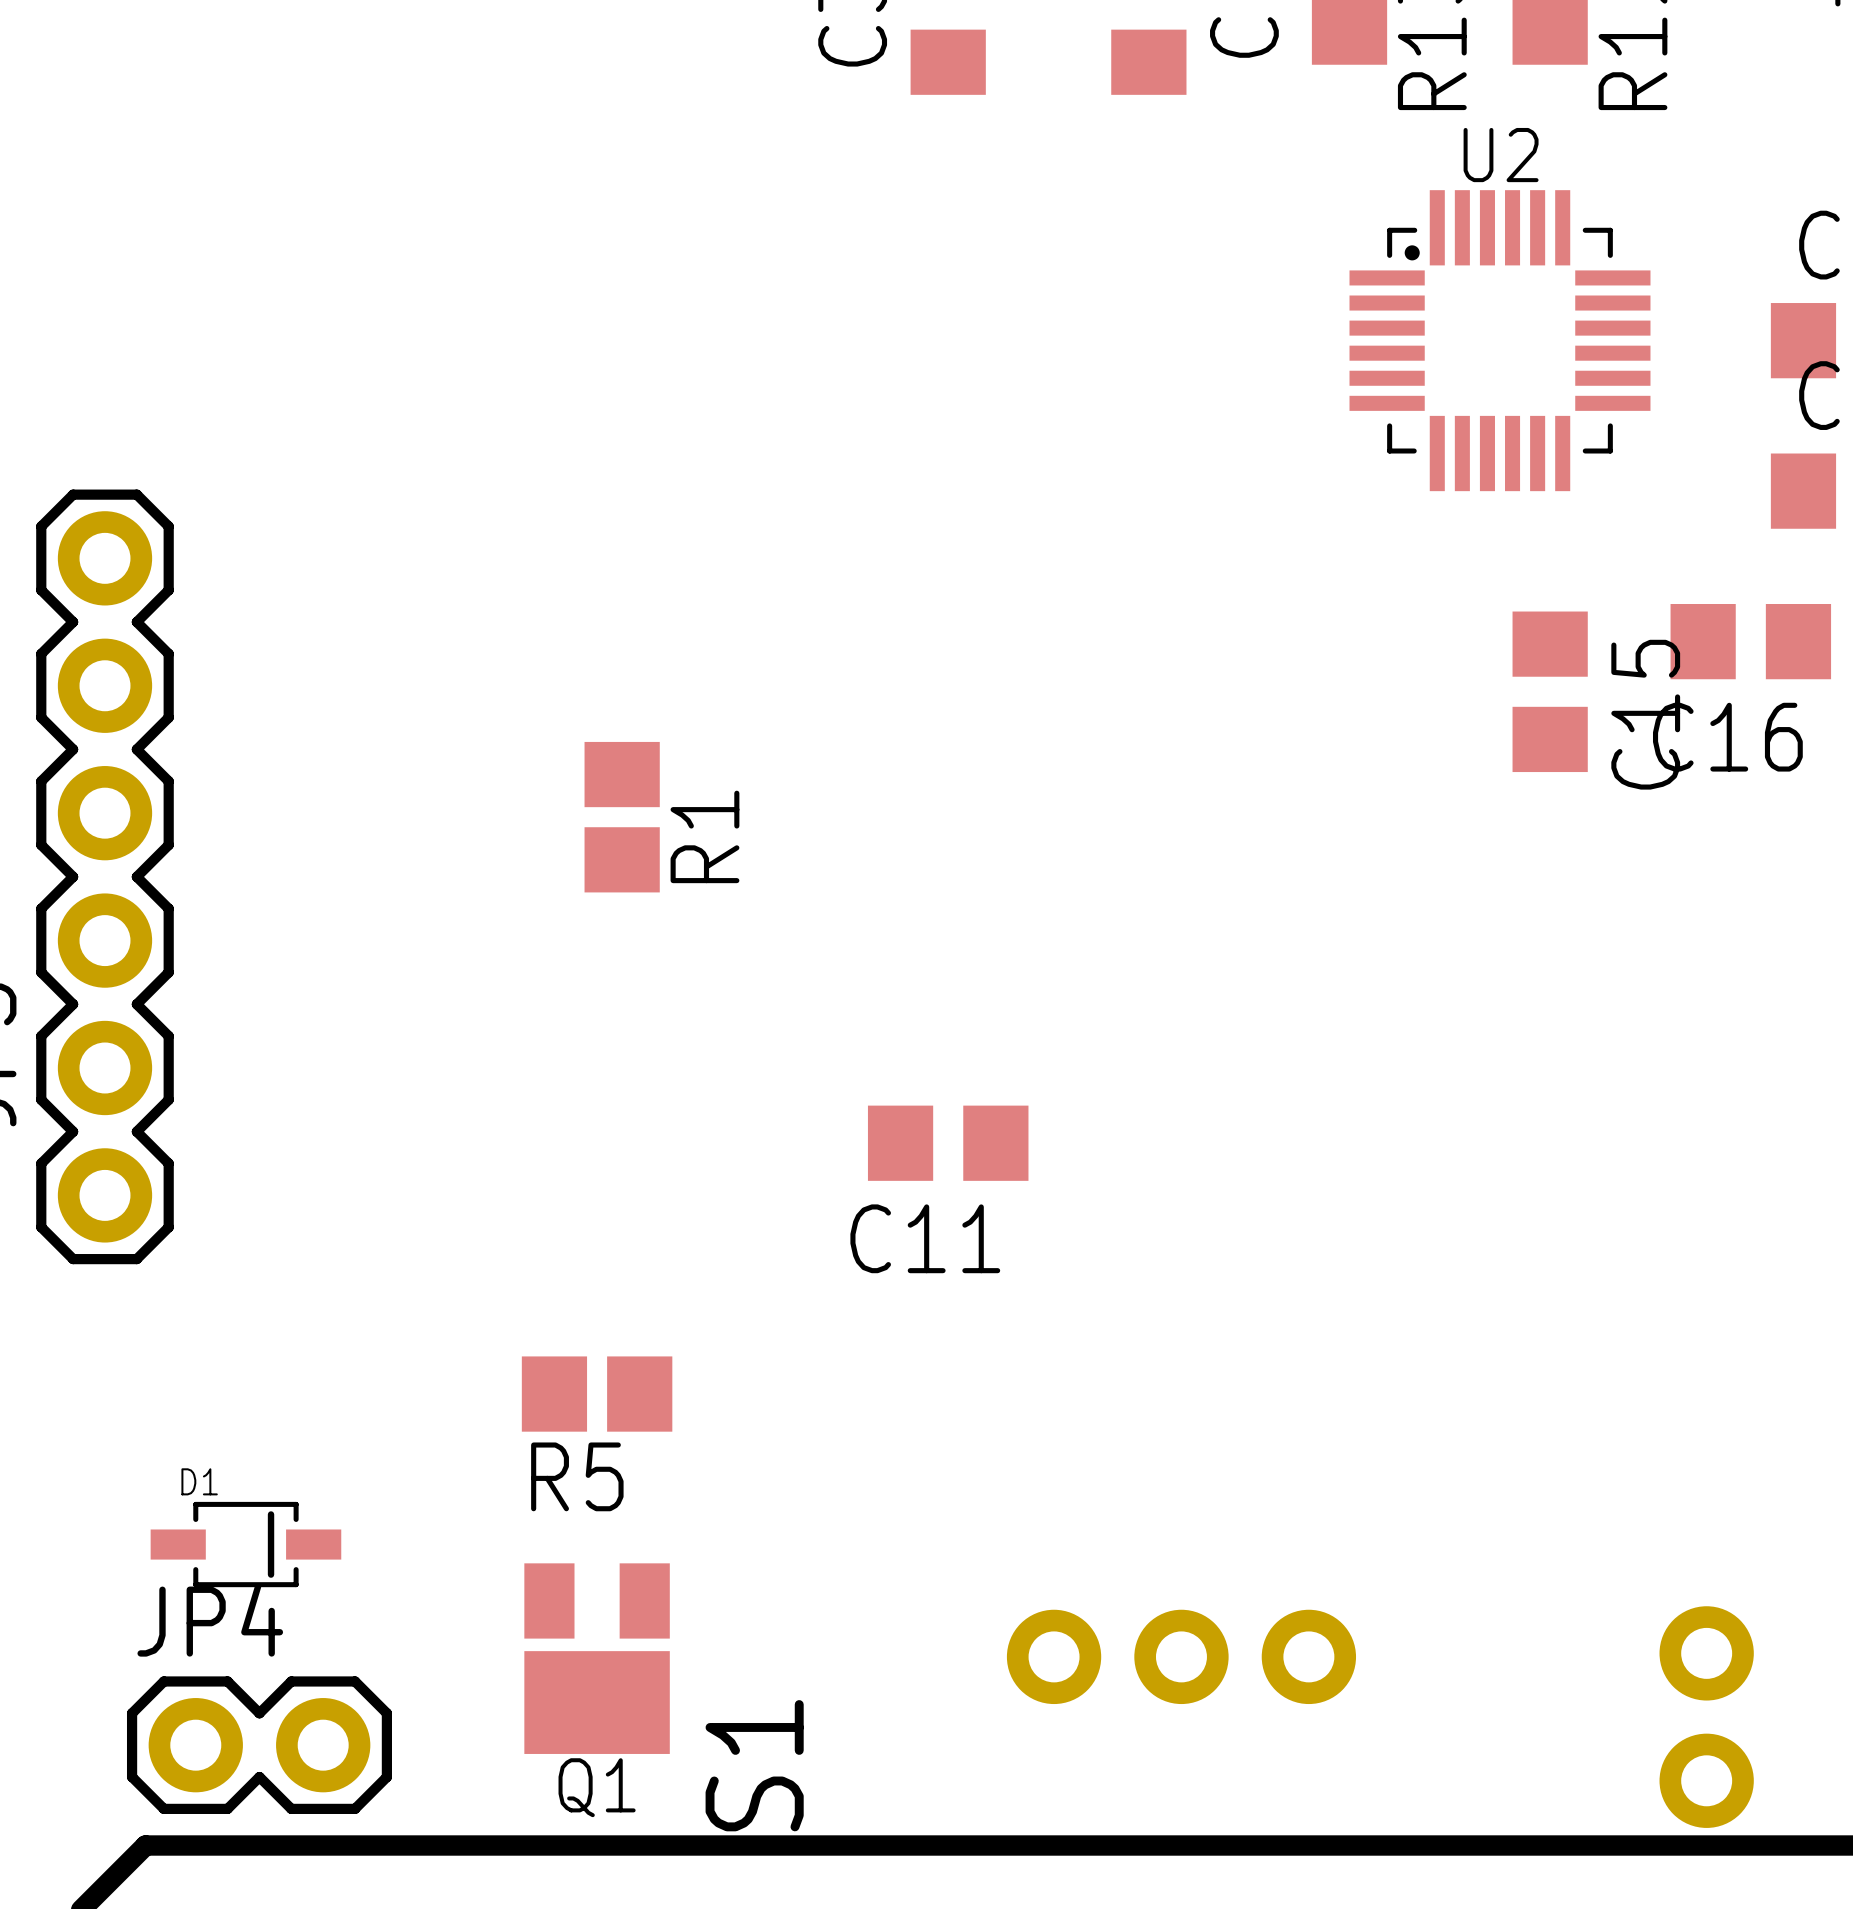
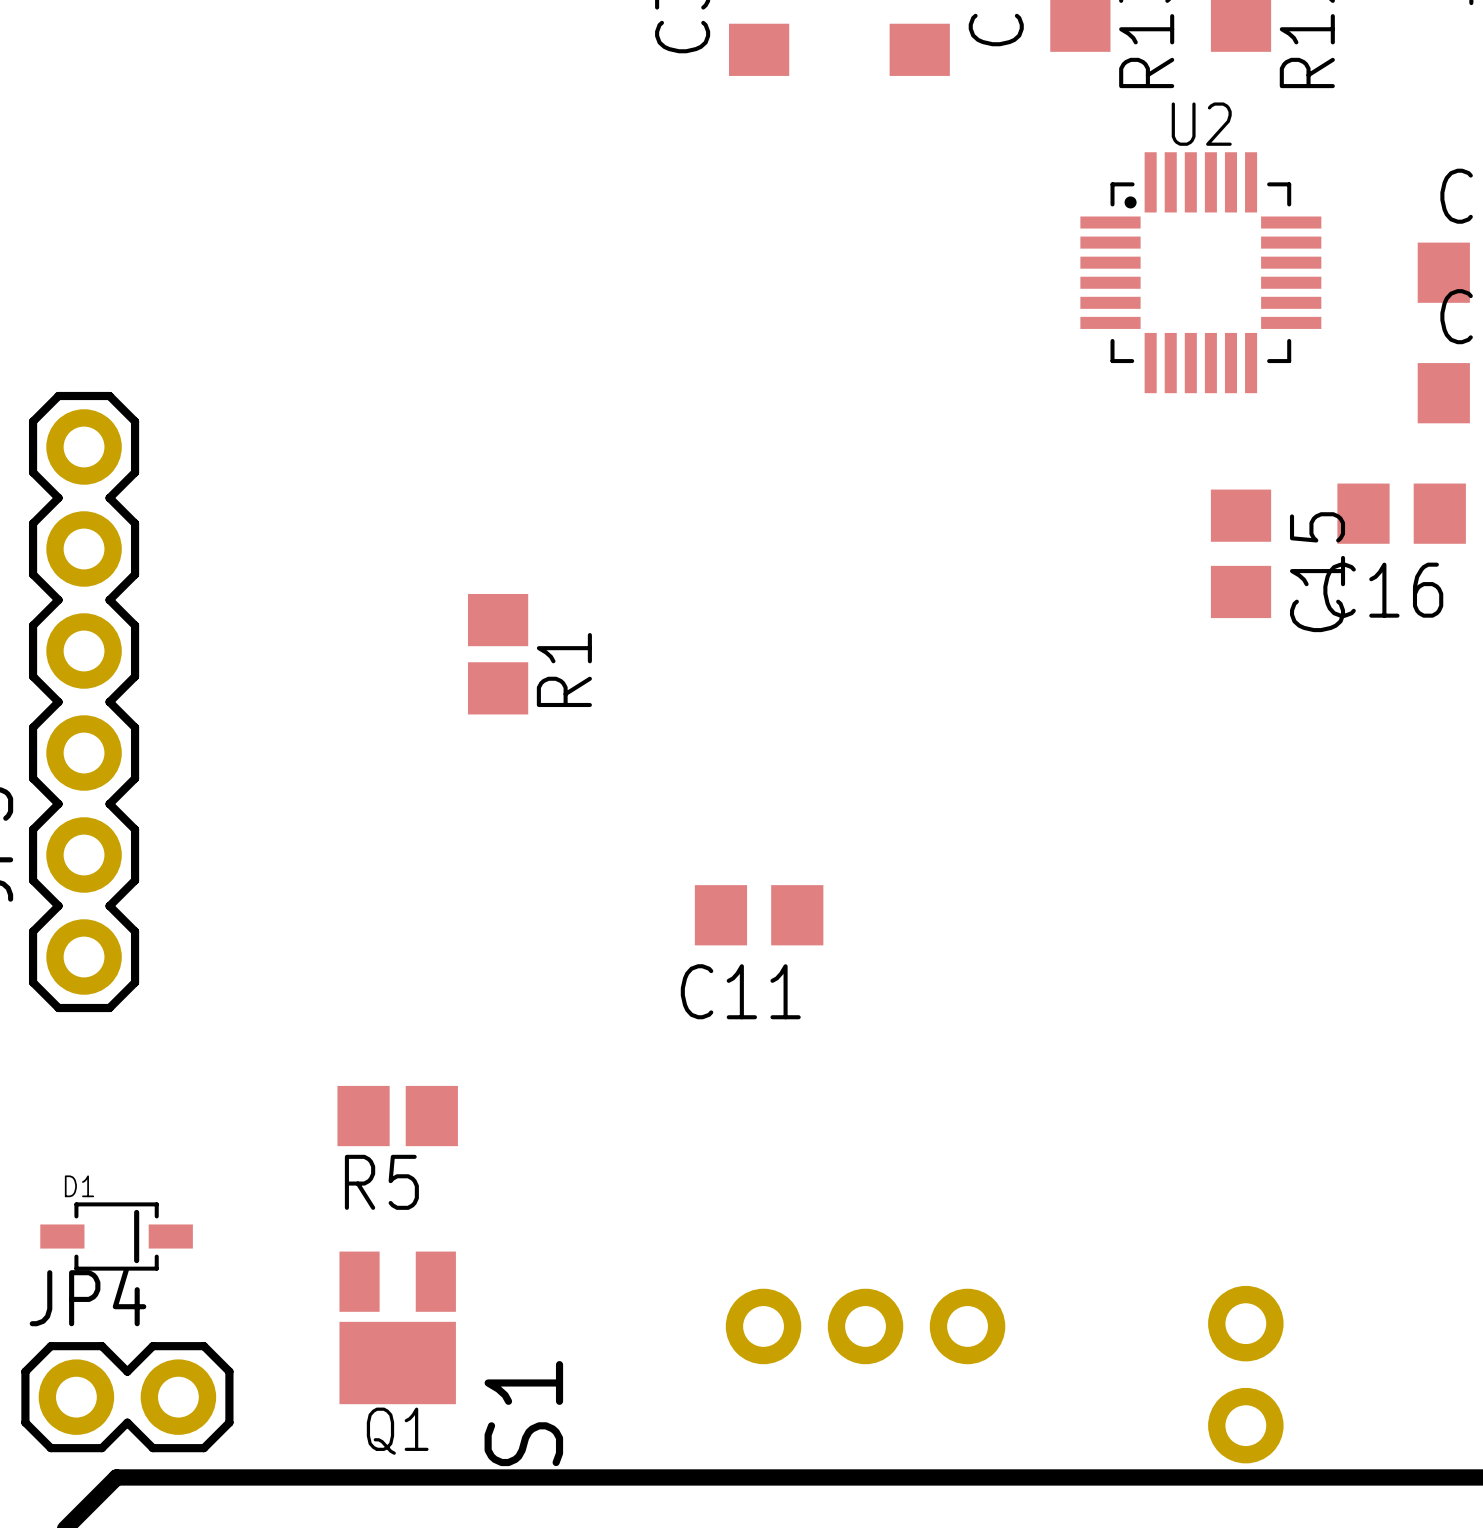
R5 position: (597, 1394) -> (397, 1116)
D1 position: (245, 1544) -> (116, 1236)
S1 position: (1181, 1656) -> (865, 1326)
Q1 position: (597, 1658) -> (397, 1327)
part position: (1706, 1717) -> (1245, 1374)
JP4 position: (259, 1745) -> (127, 1397)

